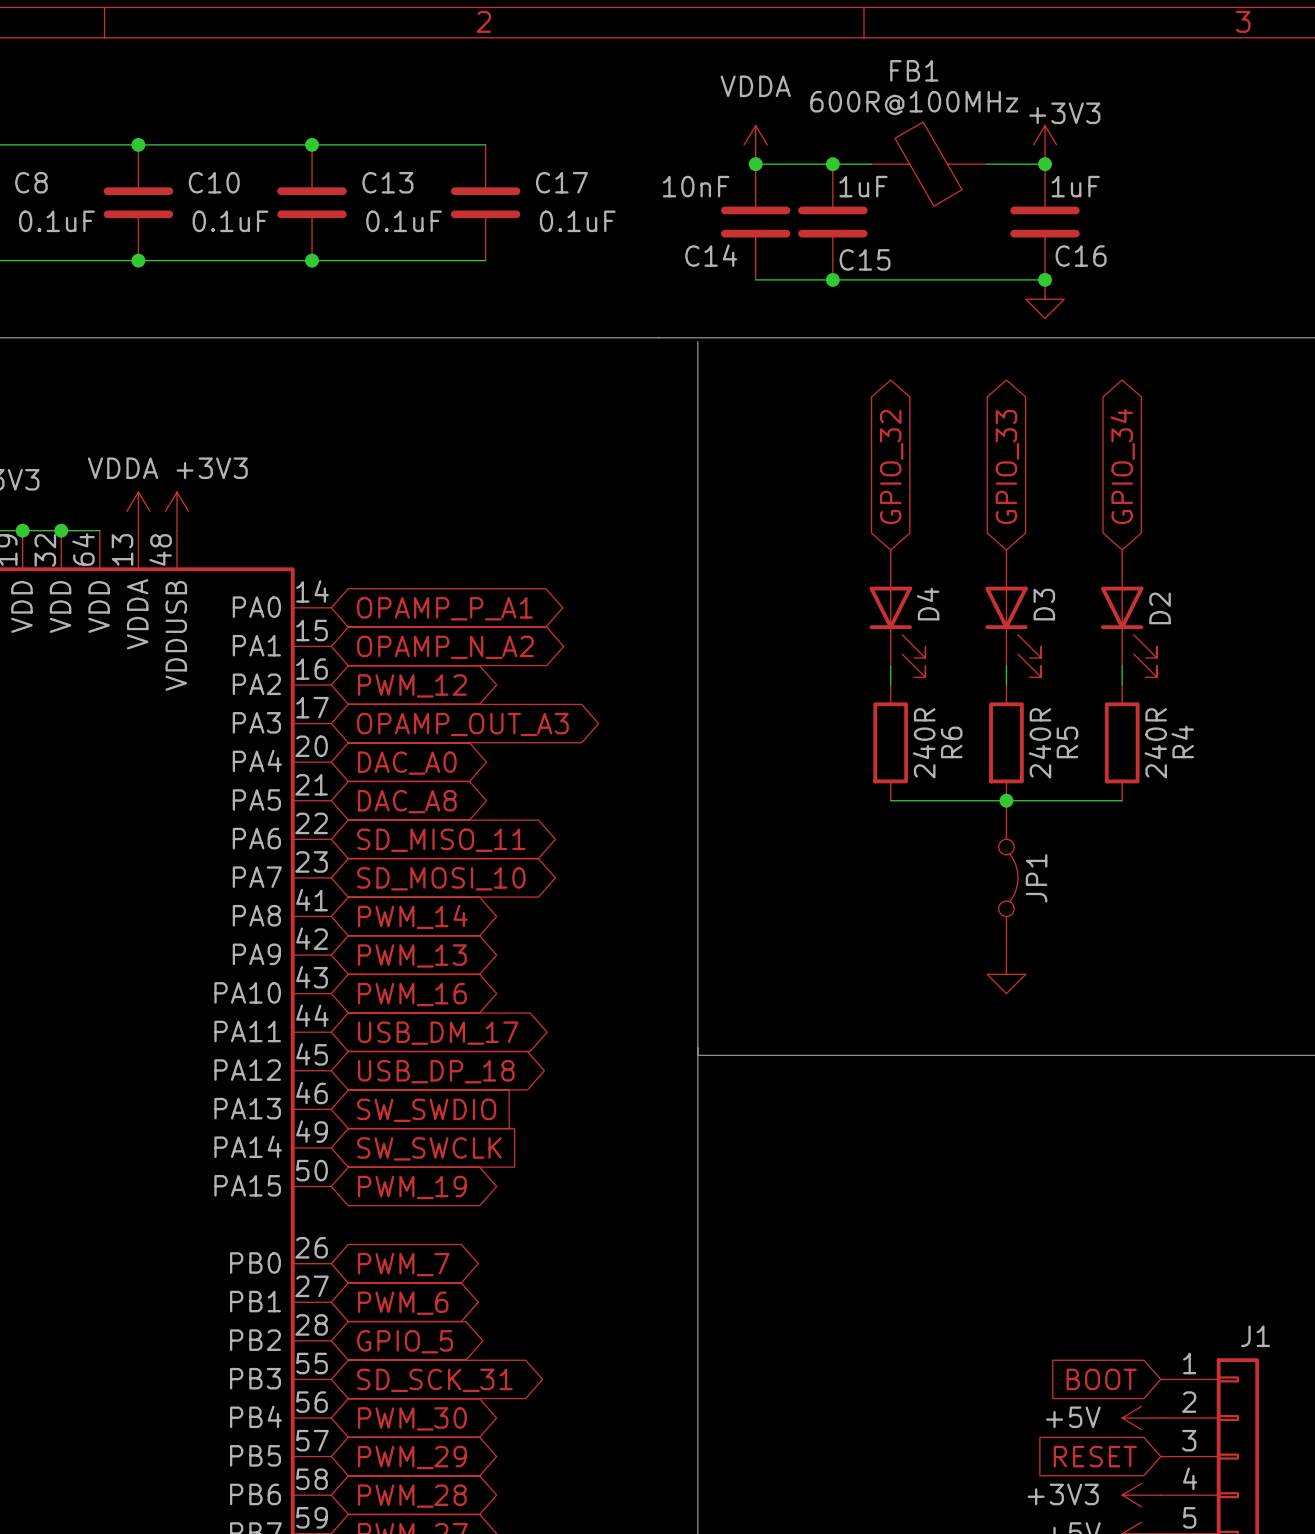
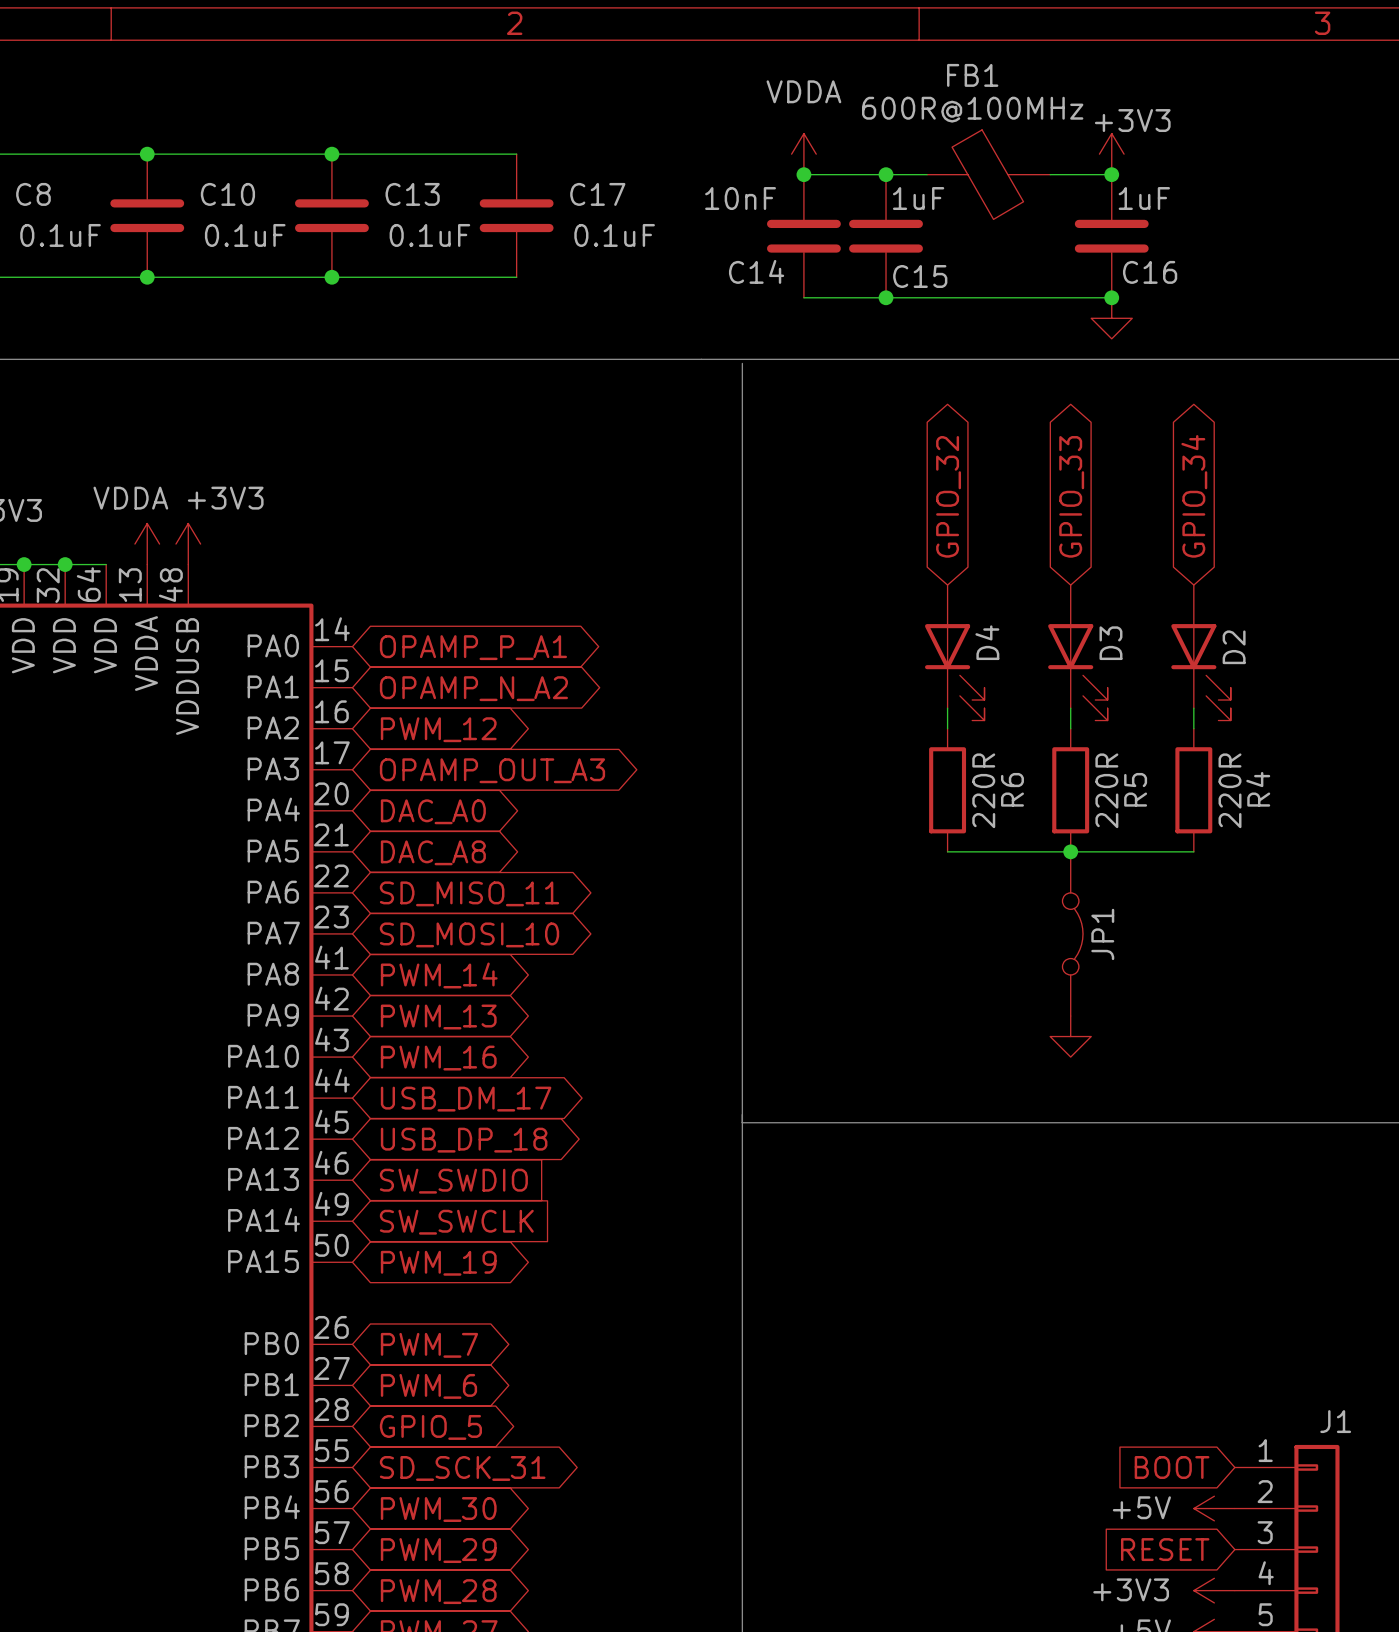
R6 value: 240R (924, 743) -> 220R (983, 790)
R5 value: 240R (1039, 743) -> 220R (1106, 790)
R4 value: 240R (1155, 743) -> 220R (1230, 790)

